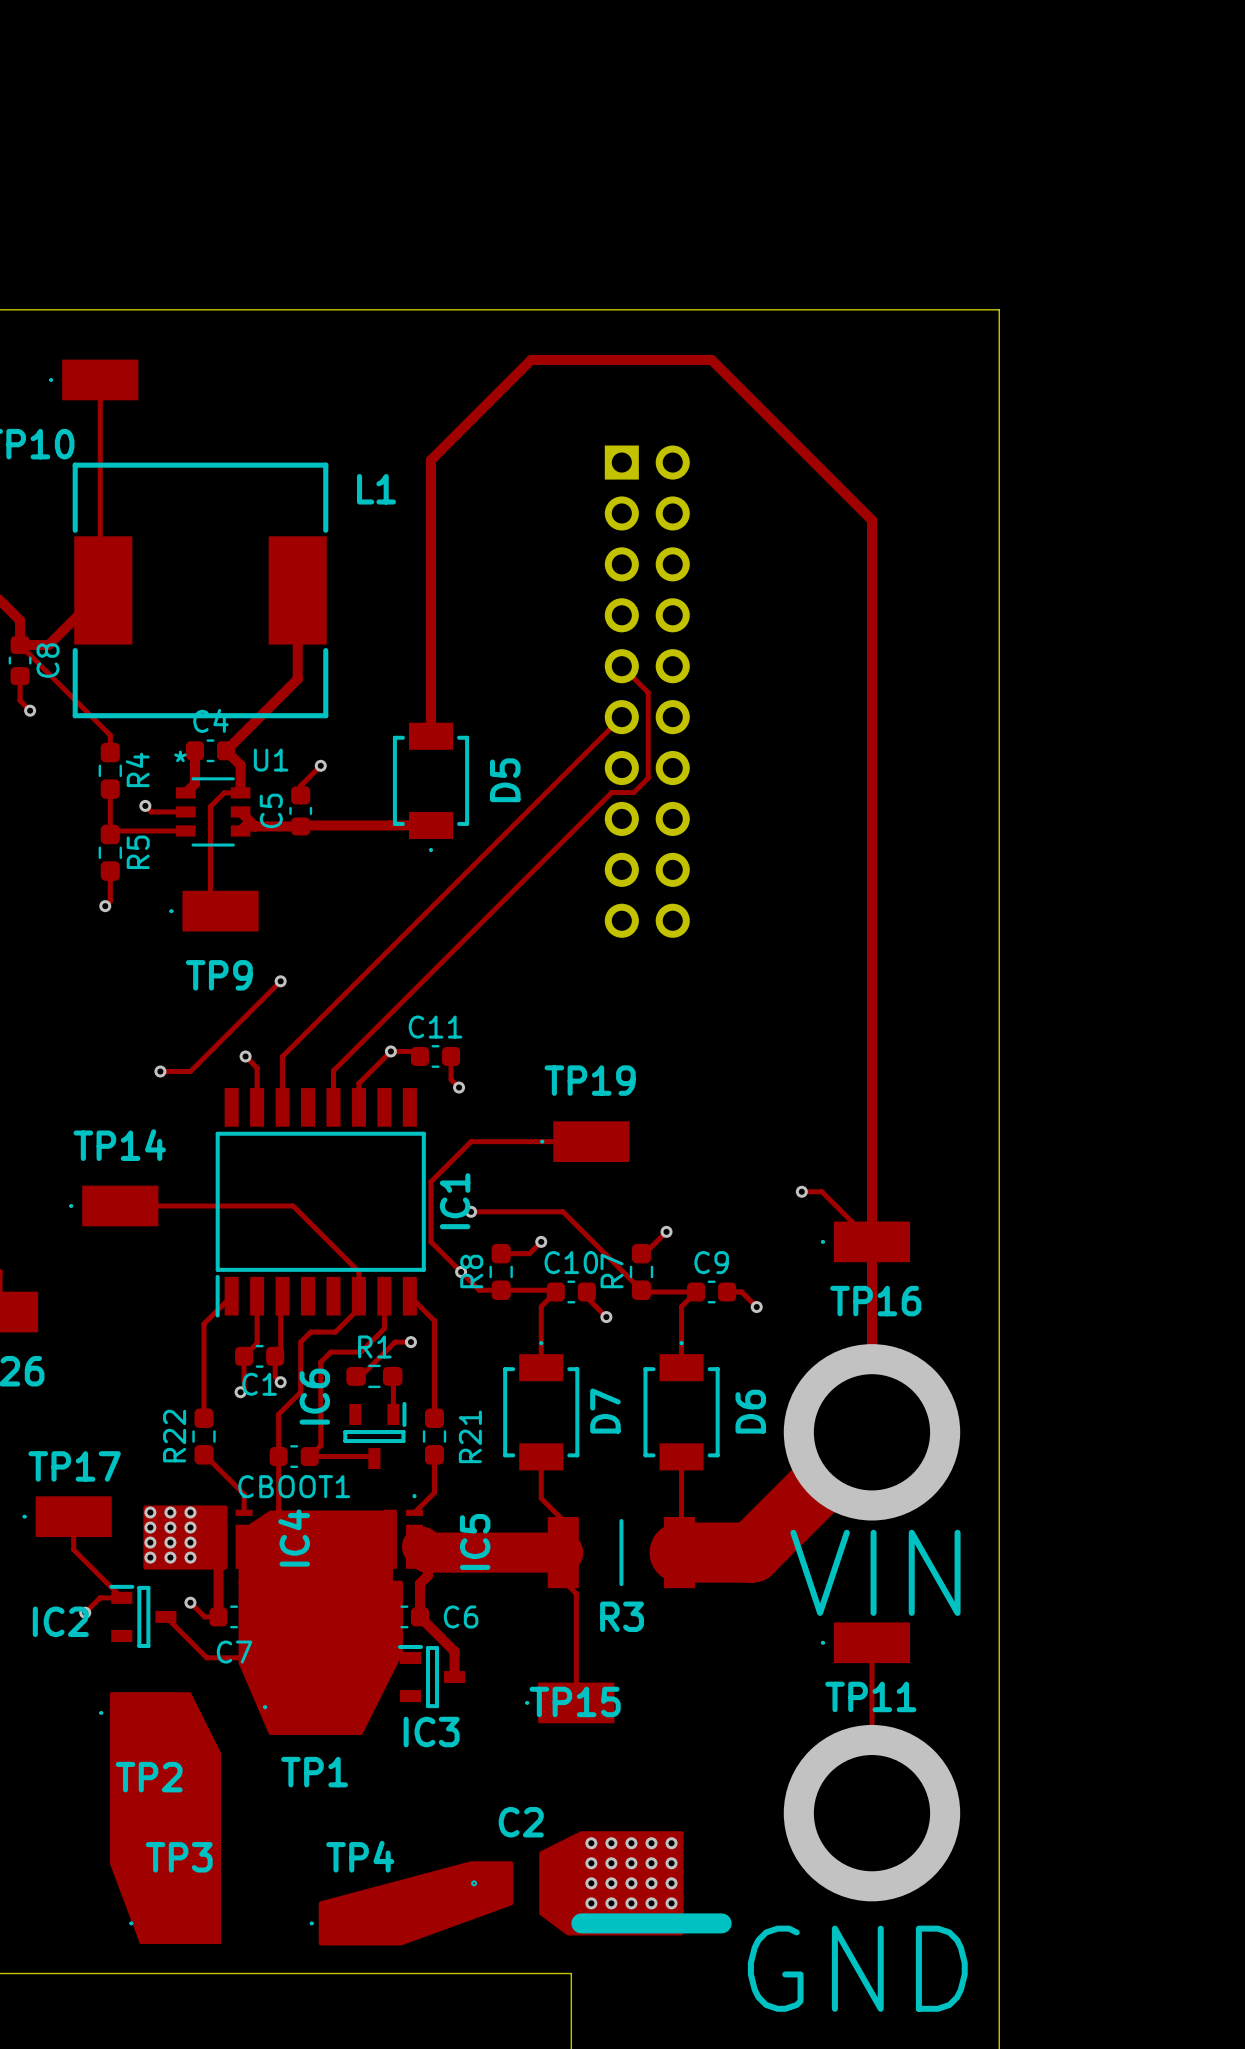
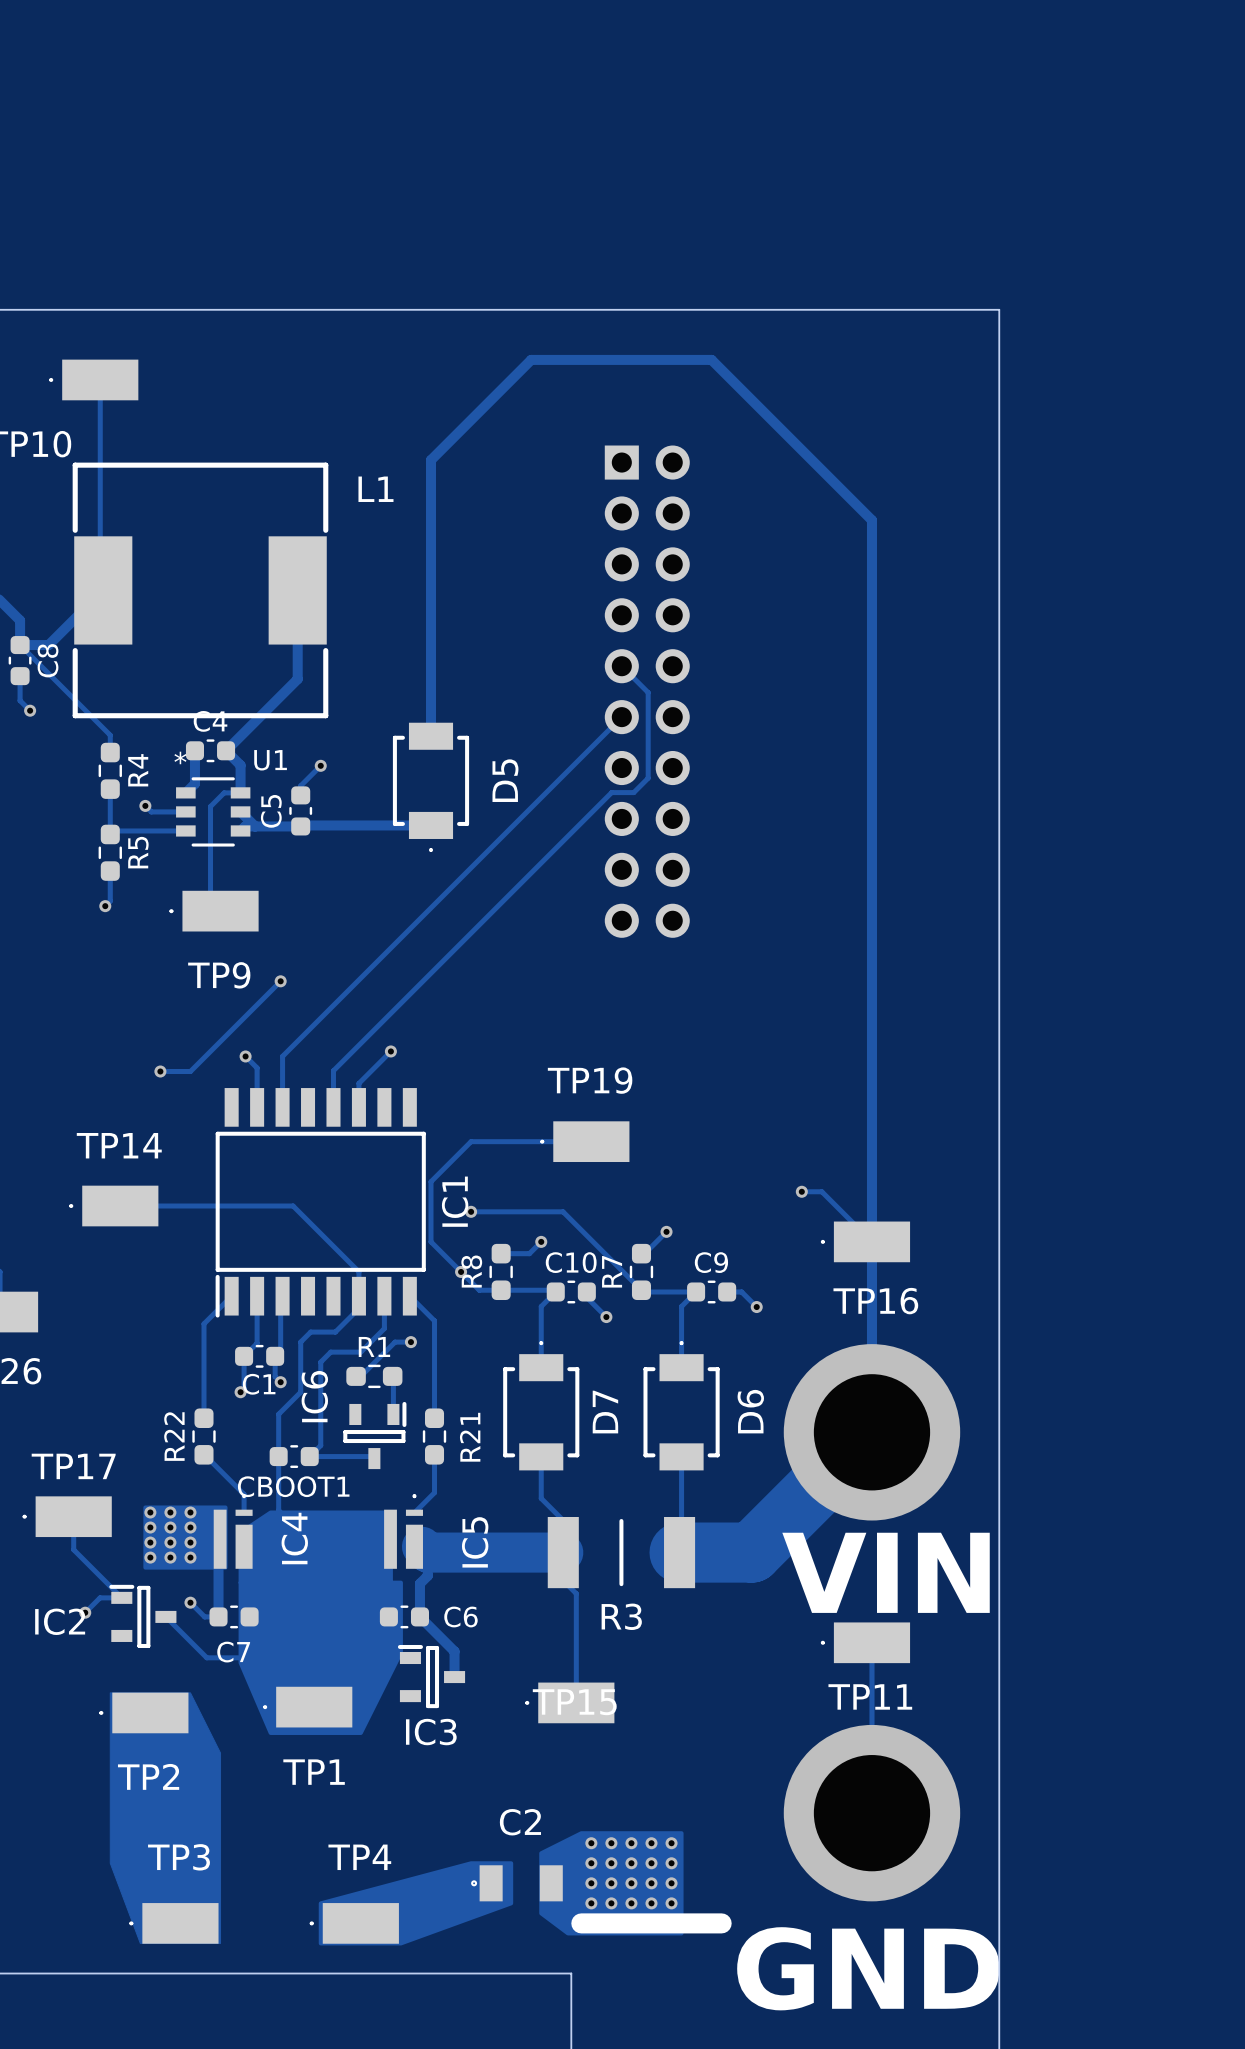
track: (390, 1051) (414, 1051) (419, 1056) -> none
C11: (435, 1056) -> none
track: (451, 1056) (451, 1079) (459, 1087) -> none
via: (459, 1087) -> none

